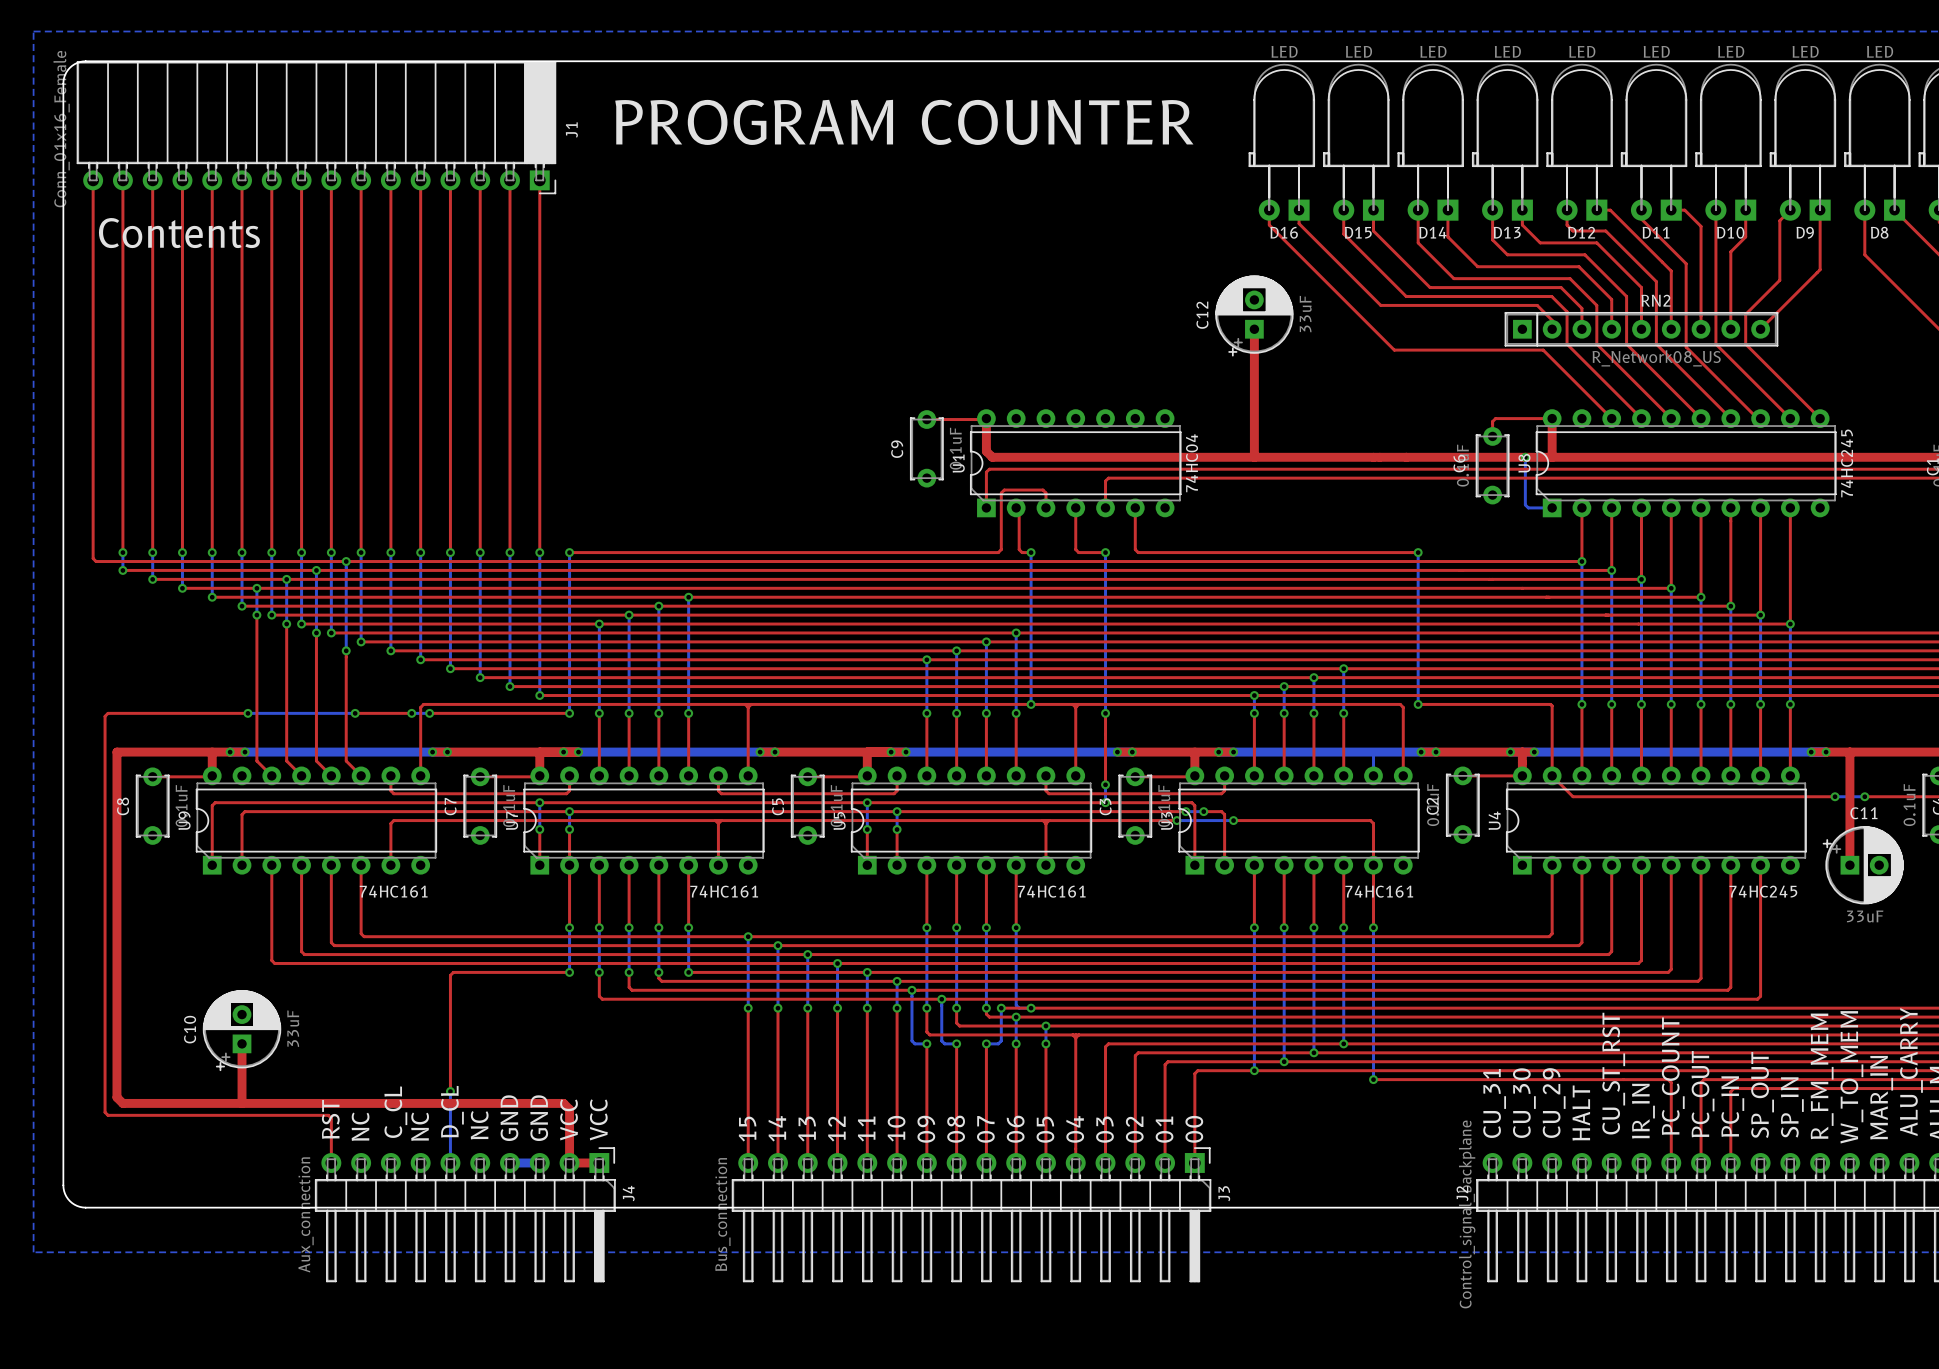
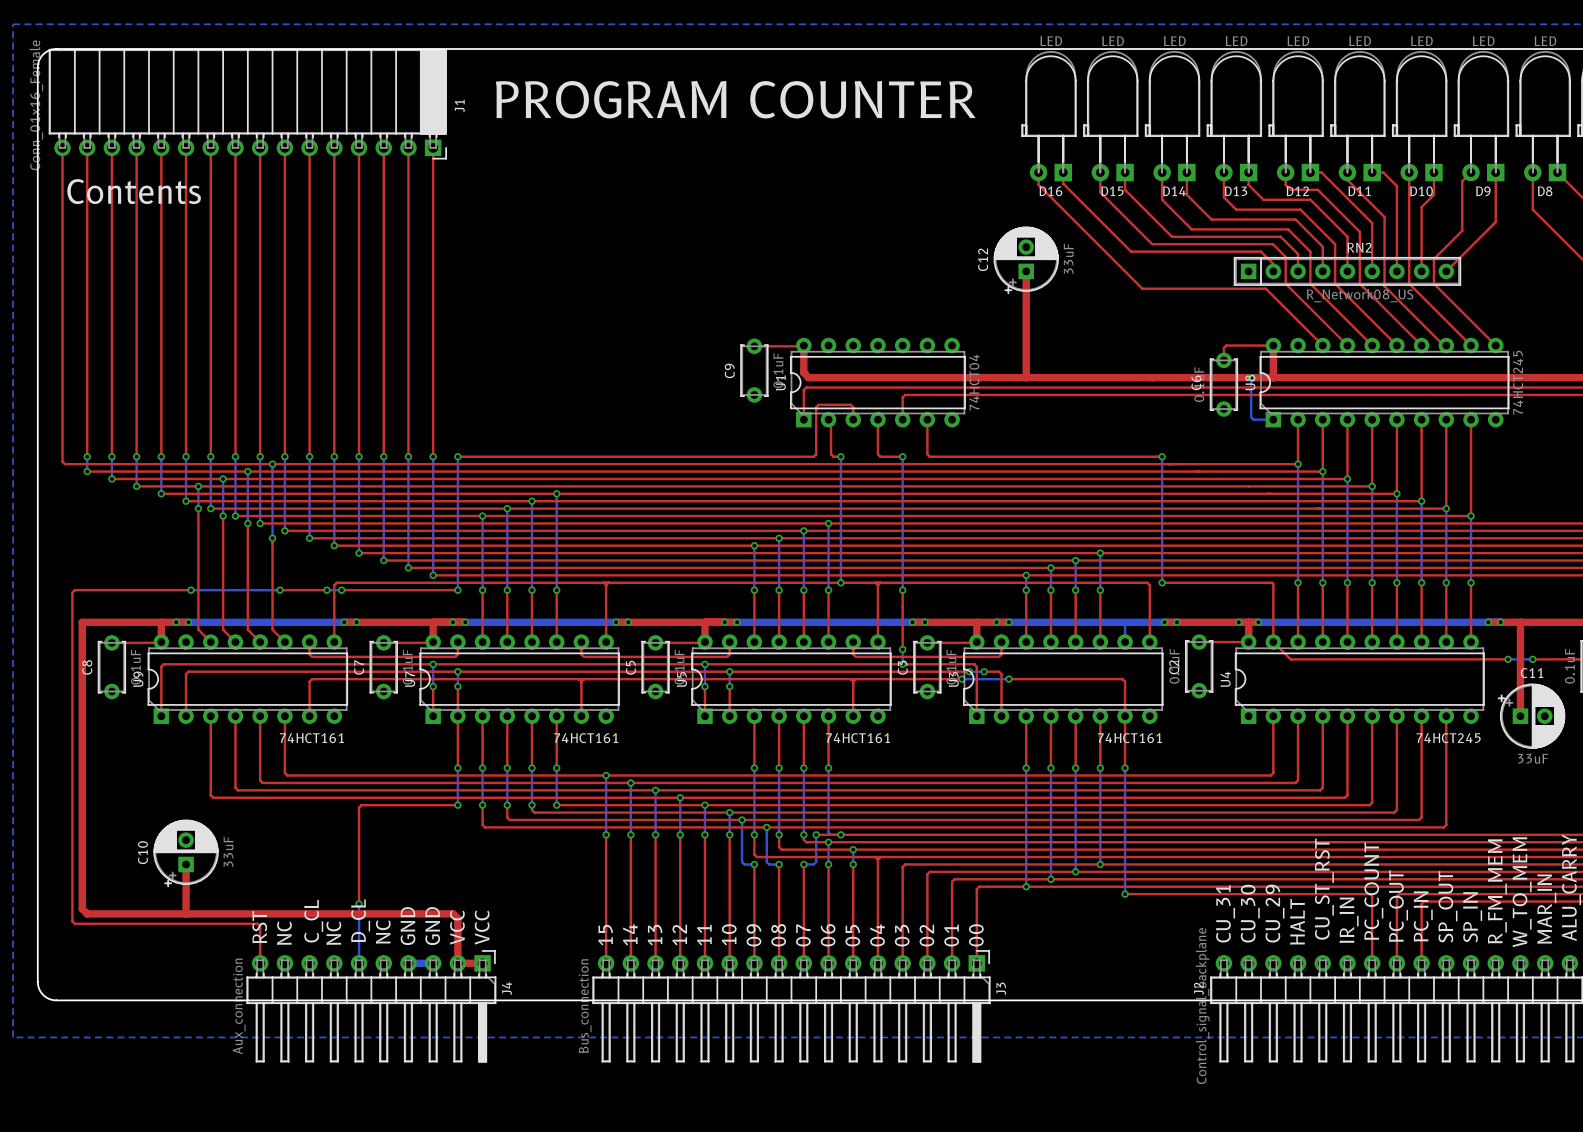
U1 value: 74HC04 (1192, 463) -> 74HCT04 (974, 382)
U8 value: 74HC245 (1847, 463) -> 74HCT245 (1518, 382)
U9 value: 74HC161 (393, 891) -> 74HCT161 (311, 738)
U7 value: 74HC161 (724, 891) -> 74HCT161 (586, 738)
U5 value: 74HC161 (1051, 891) -> 74HCT161 (858, 738)
U3 value: 74HC161 (1379, 891) -> 74HCT161 (1129, 738)
U4 value: 74HC245 (1763, 891) -> 74HCT245 (1448, 738)

